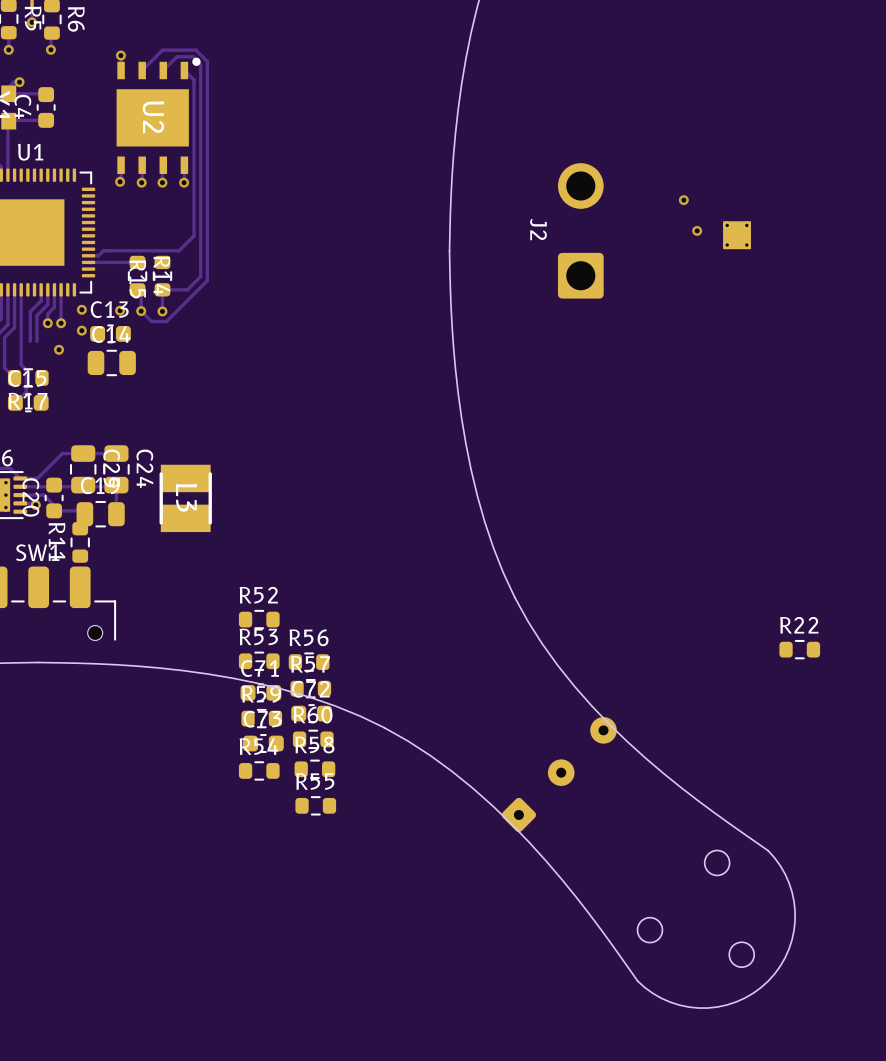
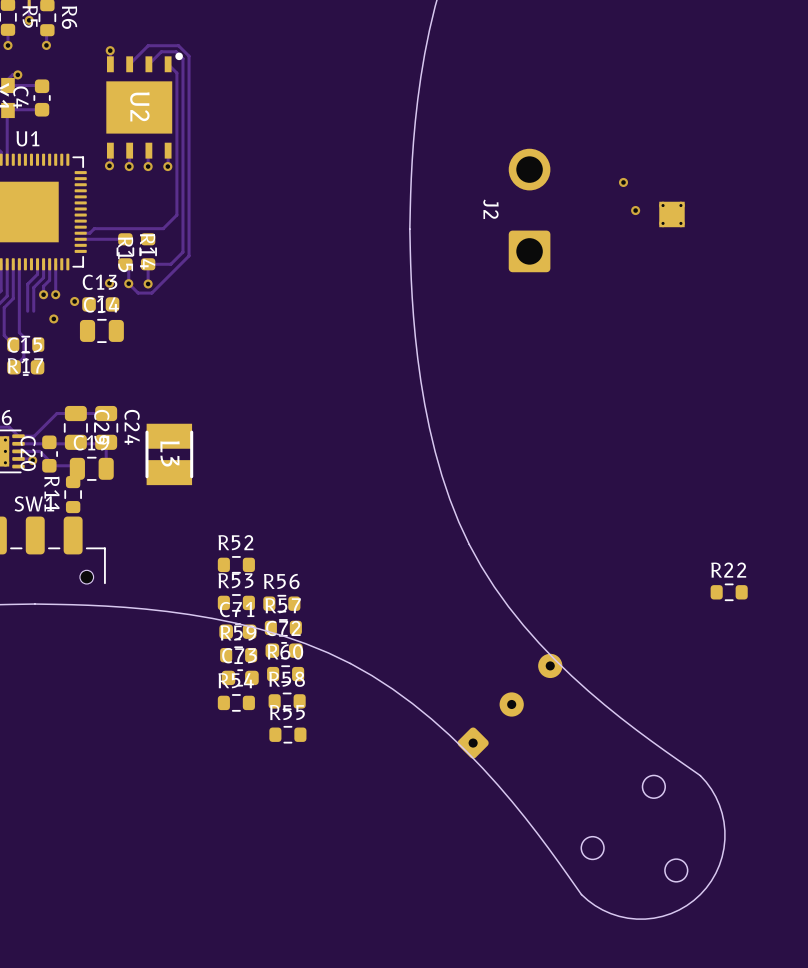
via: (81, 309) -> none

